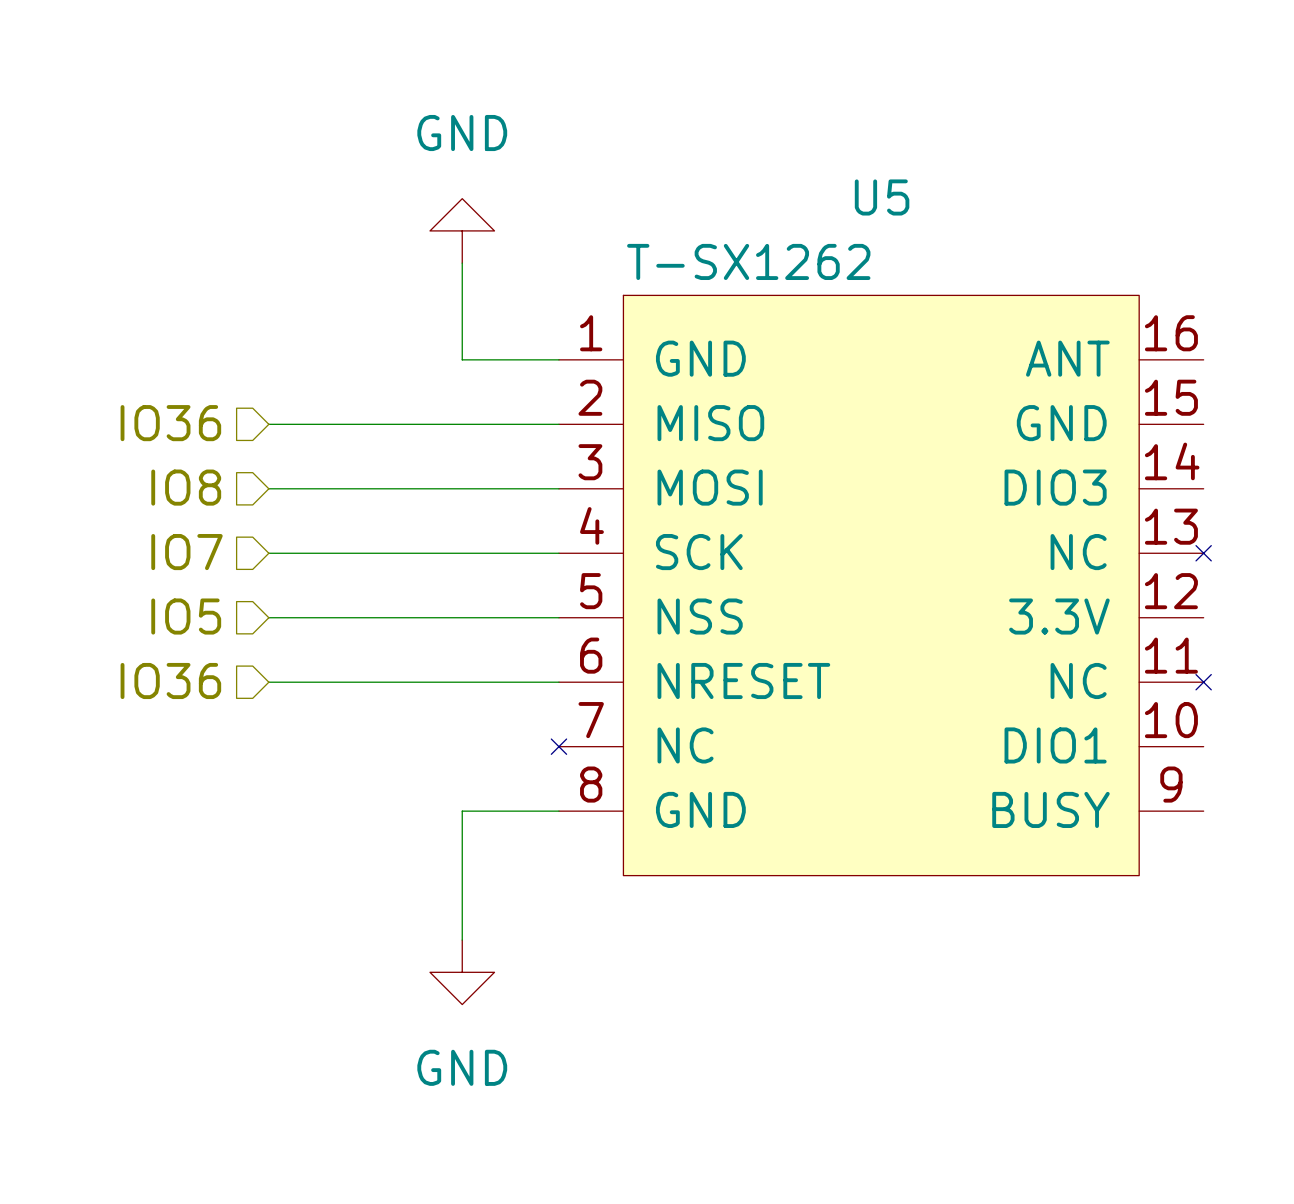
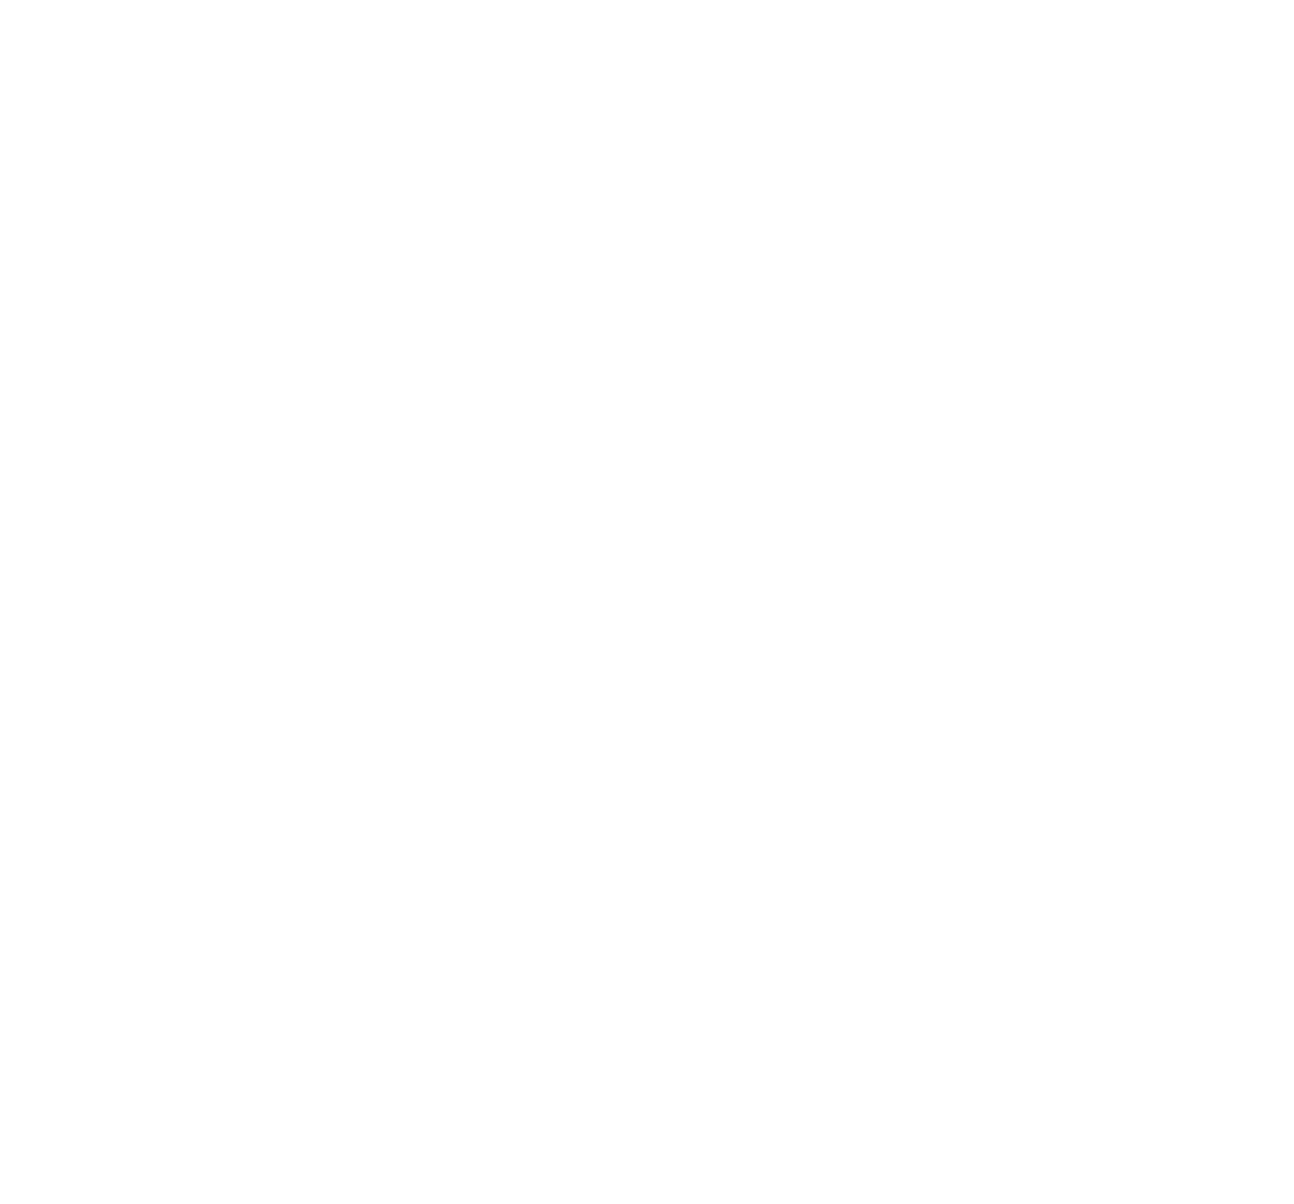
power symbol: GND (462, 230) -> none
wire: (462, 263) (462, 359) (558, 359) -> none
hierarchical label: IO36 (170, 423) -> none
wire: (268, 424) (558, 424) -> none
hierarchical label: IO8 (186, 487) -> none
wire: (268, 488) (558, 488) -> none
hierarchical label: IO7 (186, 552) -> none
wire: (268, 553) (558, 553) -> none
U5: T-SX1262 (881, 585) -> none
hierarchical label: IO5 (186, 616) -> none
wire: (268, 617) (558, 617) -> none
hierarchical label: IO36 (170, 681) -> none
wire: (268, 682) (558, 682) -> none
wire: (558, 811) (462, 811) (462, 940) -> none
power symbol: GND (462, 972) -> none

